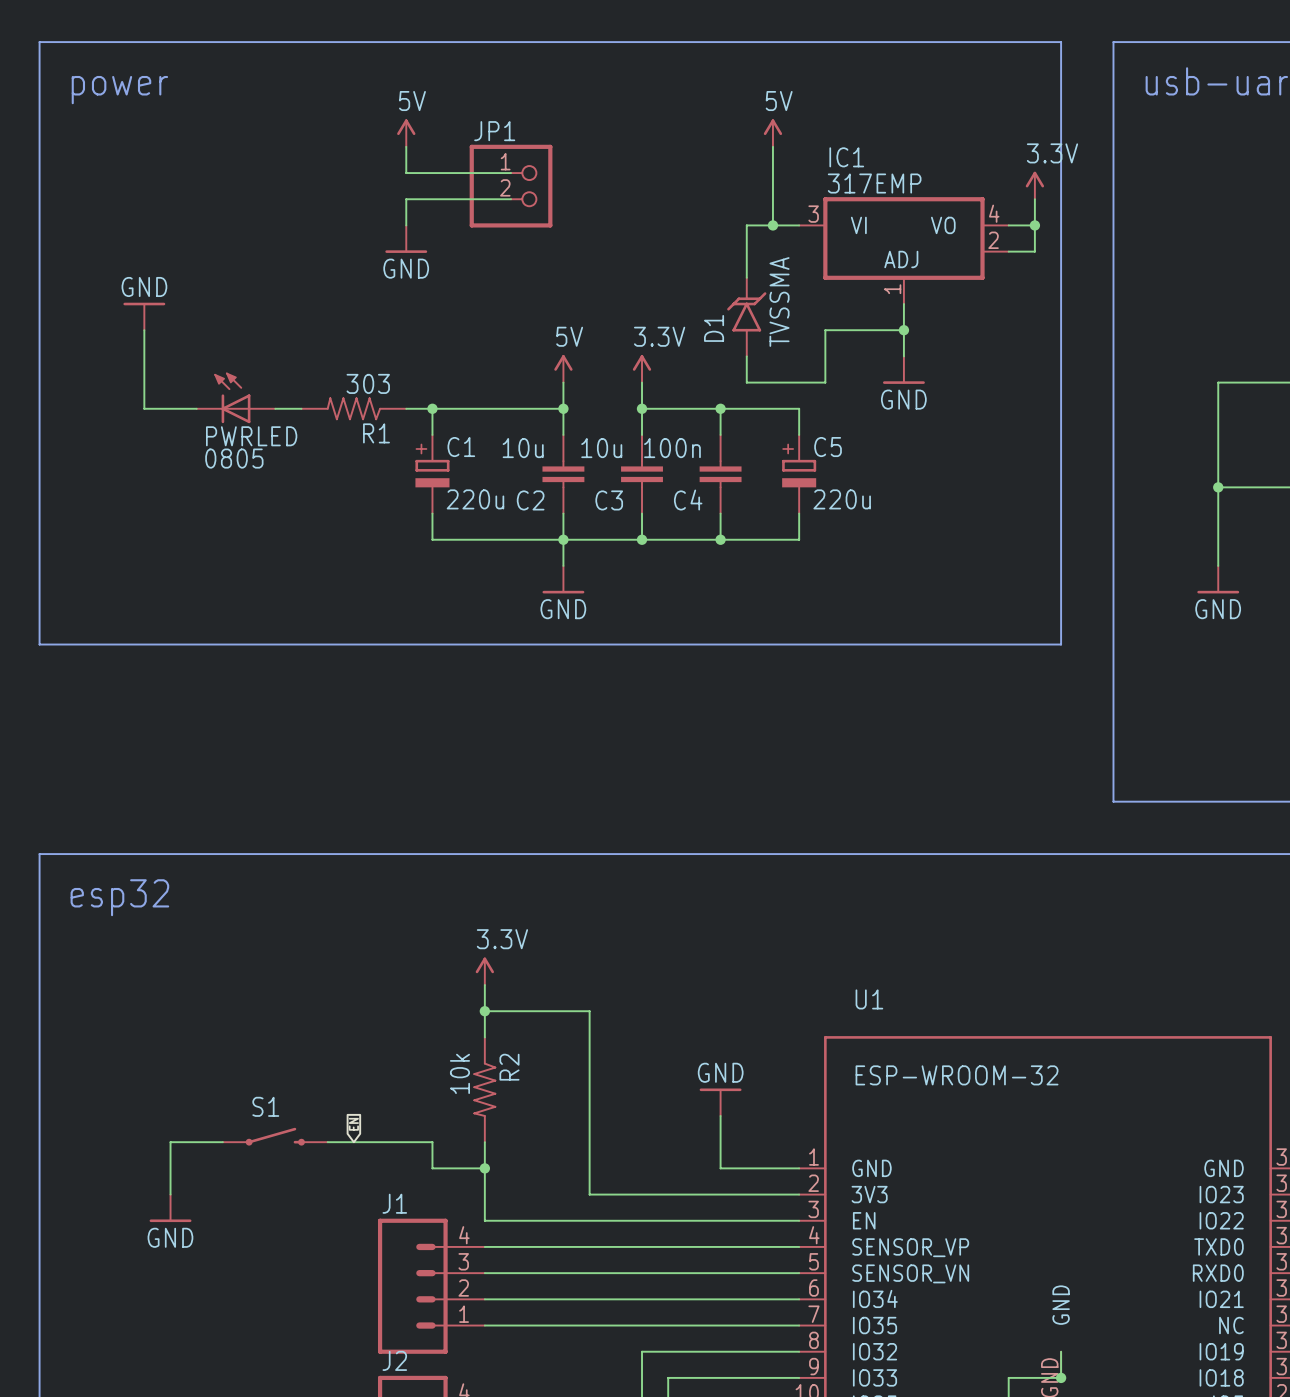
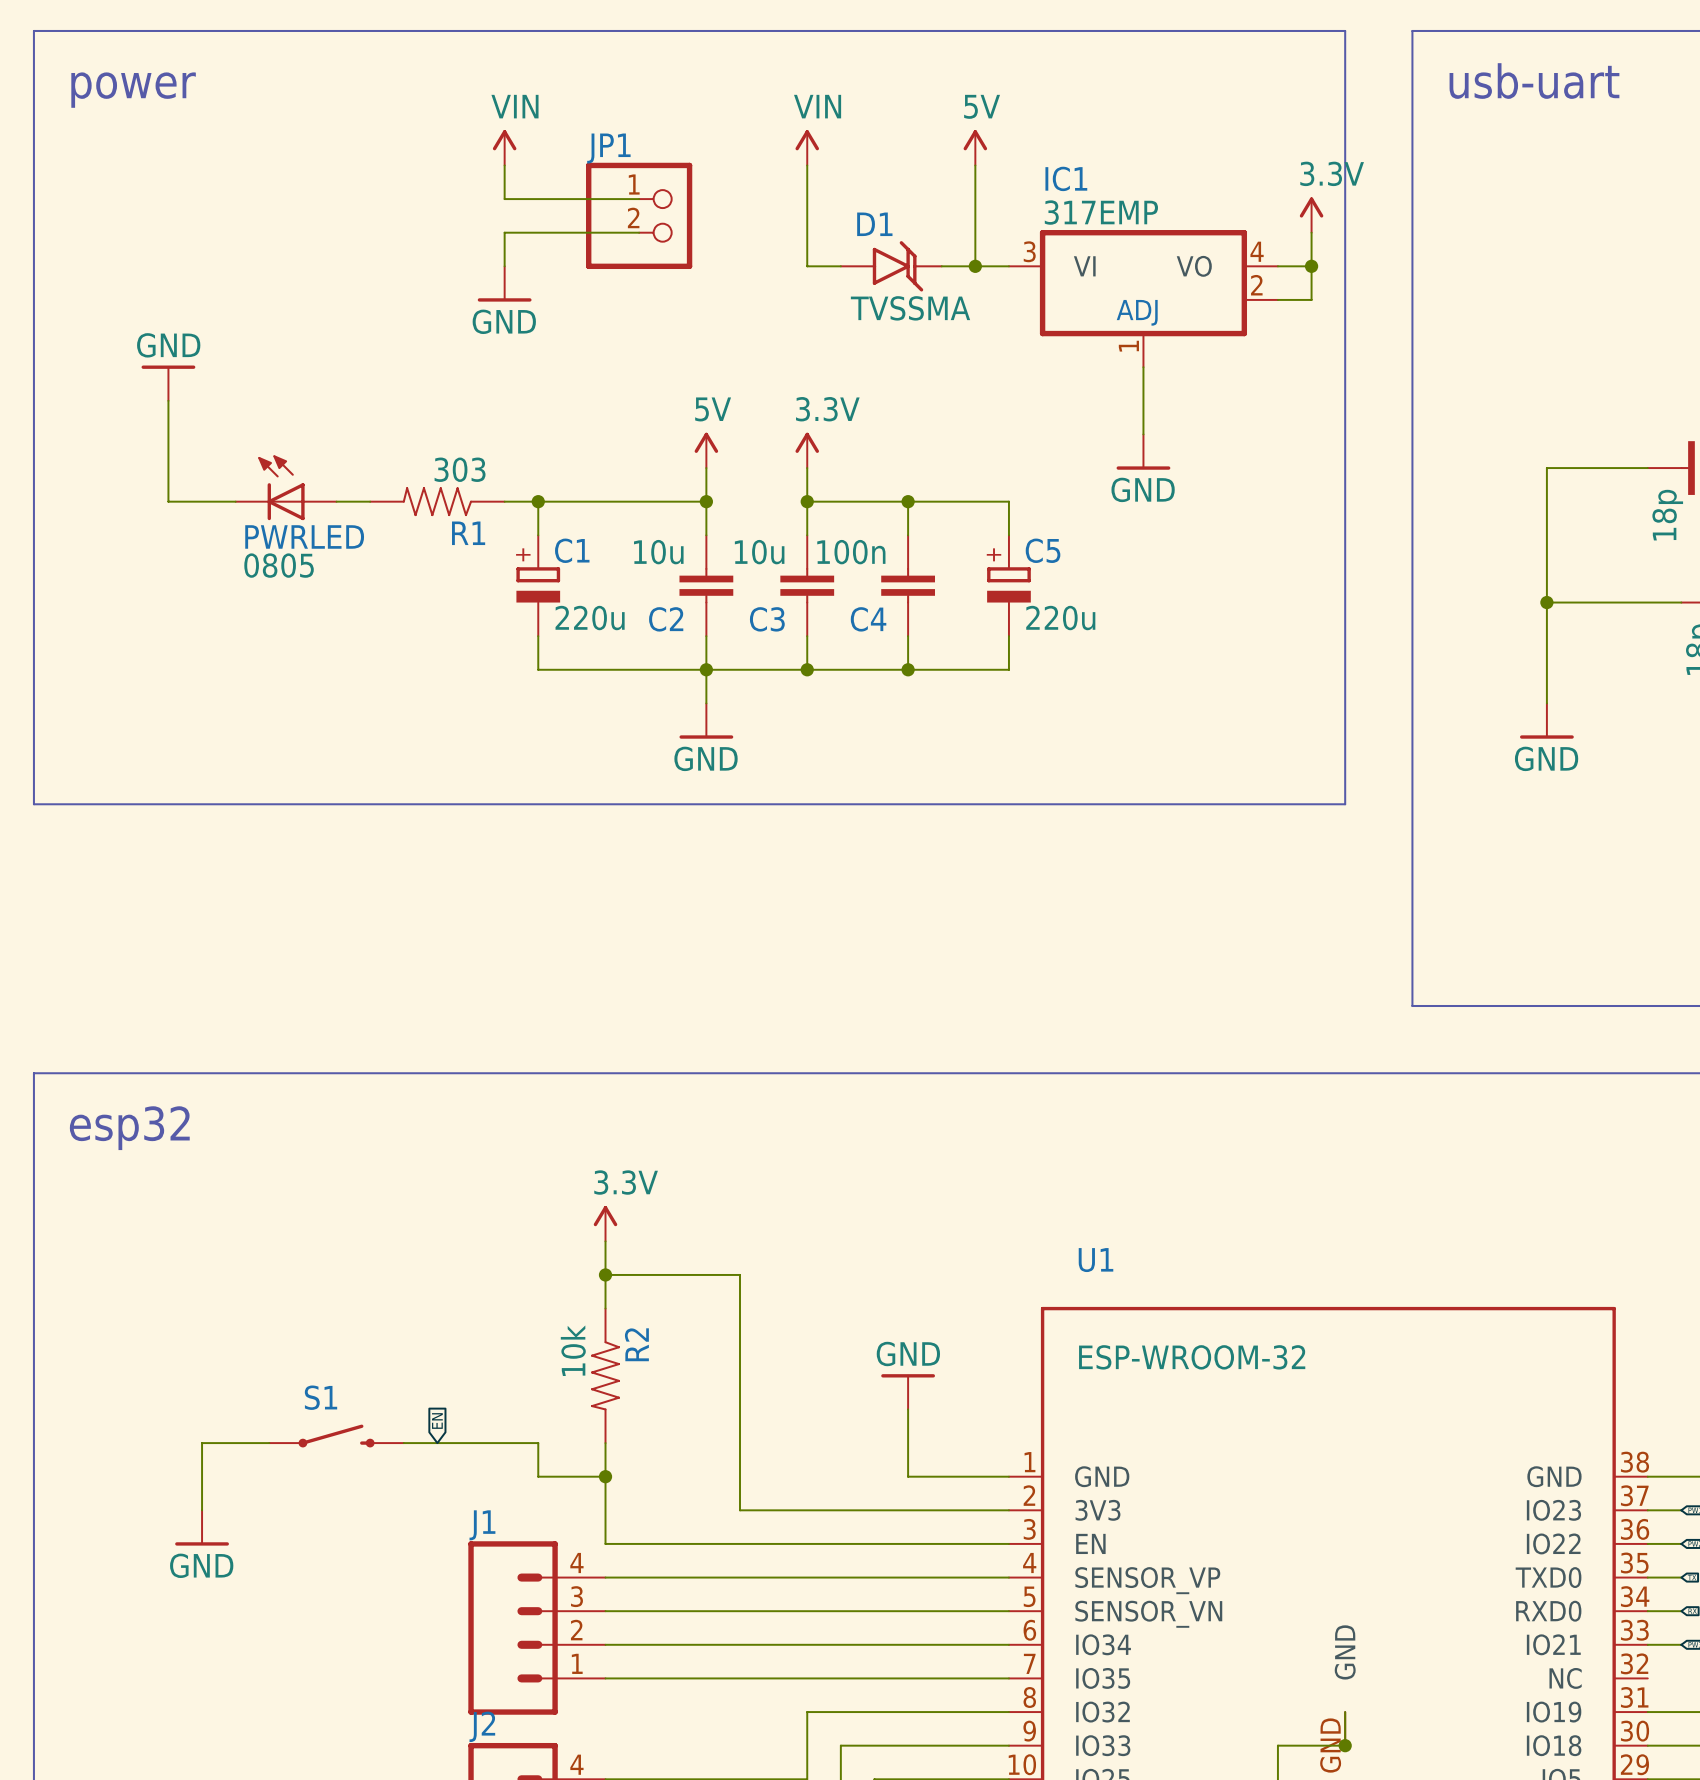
power symbol: 5V (406, 133) -> VIN (504, 147)
power symbol: none -> VIN (807, 147)
wire: none -> (807, 165) (807, 266) (840, 266)
wire: (746, 225) (746, 277) -> none
D1 rotation: 0° (746, 317) -> 90° clockwise (891, 266)
D1 position: (746, 317) -> (891, 266)
wire: (903, 330) (825, 330) (825, 382) (746, 382) (746, 356) -> none
junction: (903, 330) -> none

